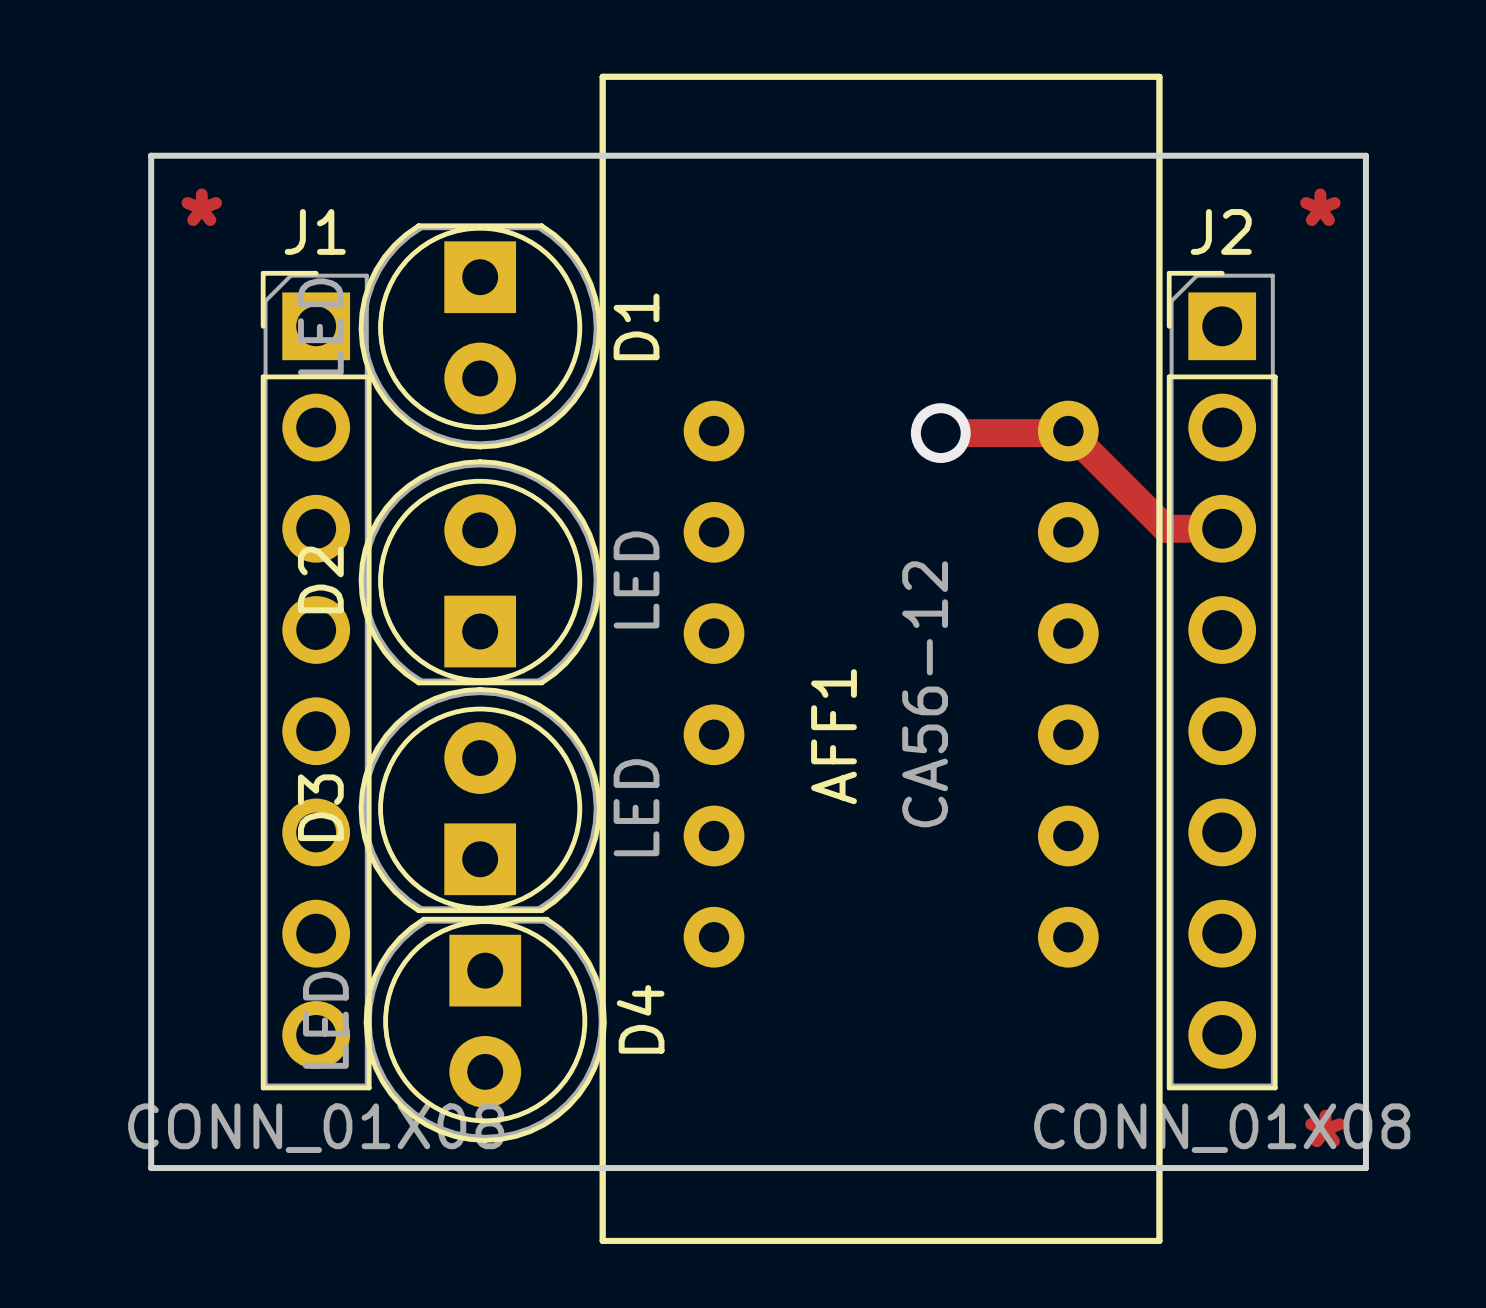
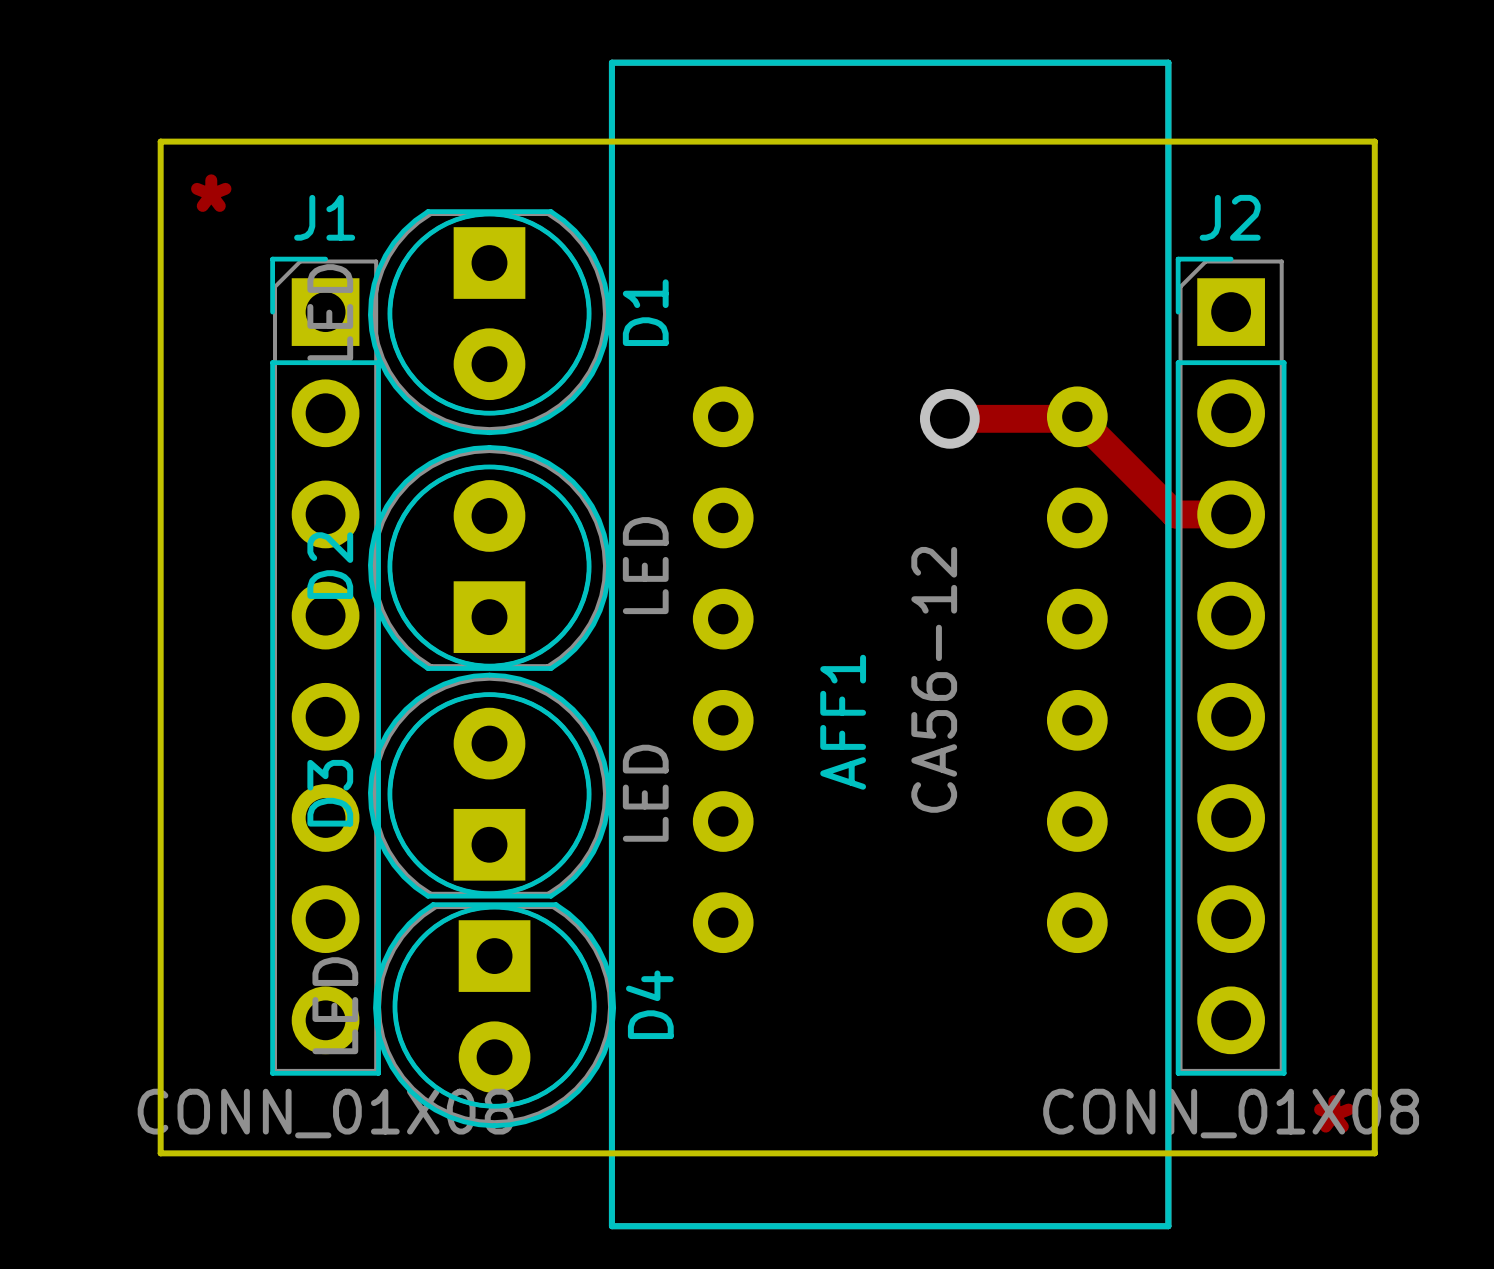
text: * (1320, 207) -> none

